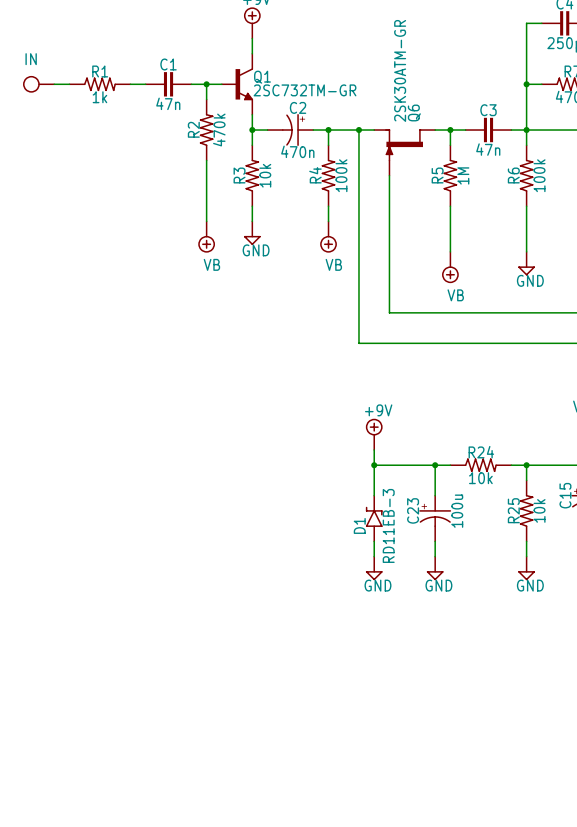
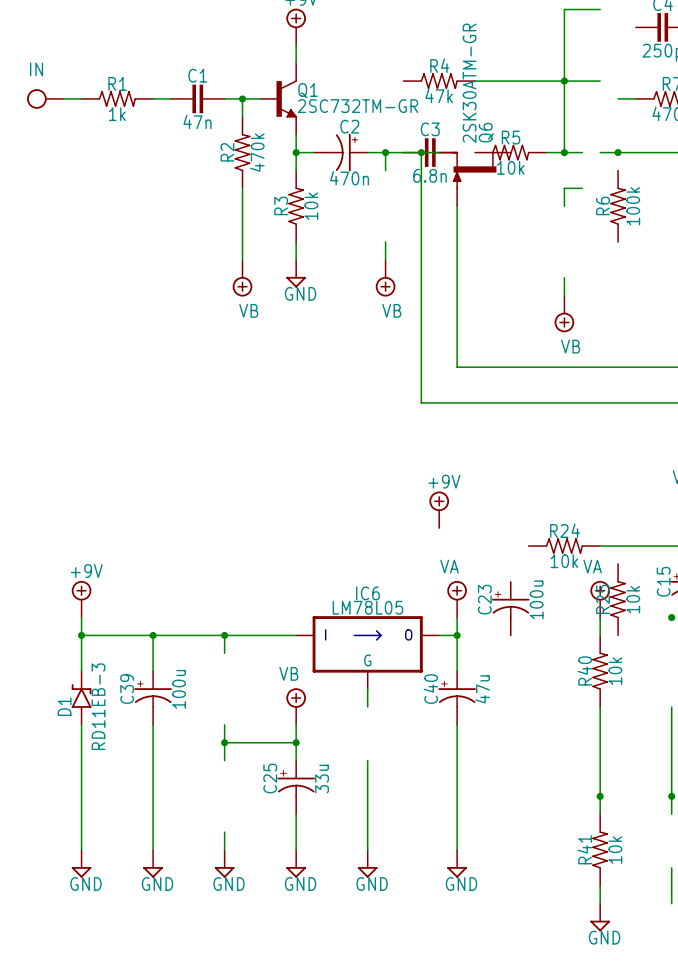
wire: none -> (600, 9) (564, 9) (564, 152)
wire: (541, 23) (526, 23) (526, 145) -> none
wire: none -> (474, 81) (600, 81)
junction: none -> (564, 81)
junction: (526, 84) -> none
wire: (450, 130) (450, 145) -> (564, 277) (564, 295)
junction position: (450, 130) -> (564, 152)
C3 position: (488, 130) -> (430, 152)
C3 value: 47n (488, 149) -> 6.8n (430, 175)
wire: none -> (582, 188) (564, 188) (564, 206)
R4 rotation: 0° (328, 175) -> 90° clockwise (439, 81)
R4 position: (328, 175) -> (439, 81)
R4 value: 100k (341, 175) -> 47k (439, 95)
R5 rotation: 0° (450, 175) -> 90° clockwise (510, 152)
R5 position: (450, 175) -> (510, 152)
R5 value: 1M (463, 175) -> 10k (510, 167)
wire: (450, 206) (450, 251) -> none
wire: (526, 206) (526, 251) -> none
power symbol: GND (526, 263) -> none
power symbol position: VB (450, 267) -> VB (564, 313)
wire: (374, 449) (374, 495) -> (457, 617) (457, 671)
wire: (374, 465) (450, 465) -> none
junction: (374, 465) -> none
wire: (435, 465) (435, 495) -> none
junction: (435, 465) -> none
wire: (526, 465) (526, 480) -> none
junction: (526, 465) -> none
power symbol: none -> +9V (81, 599)
power symbol: none -> VA (457, 599)
power symbol: none -> VA (600, 599)
D1 position: (374, 518) -> (81, 698)
wire: none -> (81, 617) (81, 671)
junction: none -> (671, 617)
wire: none -> (81, 635) (296, 635)
junction: none -> (81, 635)
wire: none -> (153, 635) (153, 671)
junction: none -> (153, 635)
wire: none -> (224, 635) (224, 653)
junction: none -> (224, 635)
wire: (374, 541) (374, 556) -> (439, 635) (457, 635)
junction: none -> (457, 635)
wire: (435, 541) (435, 556) -> (367, 689) (367, 706)
wire: (526, 541) (526, 556) -> (600, 617) (600, 635)
IC6: none -> LM78L05 (367, 652)
power symbol: GND (374, 568) -> none
power symbol: GND (435, 568) -> none
power symbol: GND (526, 568) -> none
R40: none -> 10k (600, 671)
C39: none -> 100u (153, 698)
C40: none -> 47u (457, 698)
power symbol: none -> VB (296, 706)
wire: none -> (600, 706) (600, 814)
wire: none -> (671, 706) (671, 814)
wire: none -> (81, 724) (81, 850)
wire: none -> (153, 724) (153, 850)
wire: none -> (224, 724) (224, 760)
wire: none -> (296, 724) (296, 760)
wire: none -> (457, 724) (457, 850)
wire: none -> (224, 742) (296, 742)
junction: none -> (224, 742)
junction: none -> (296, 742)
wire: none -> (367, 760) (367, 850)
C25: none -> 33u (296, 787)
junction: none -> (600, 796)
junction: none -> (671, 796)
wire: none -> (296, 814) (296, 850)
wire: none -> (224, 832) (224, 850)
R41: none -> 10k (600, 850)
power symbol: none -> GND (81, 863)
power symbol: none -> GND (153, 863)
power symbol: none -> GND (224, 863)
power symbol: none -> GND (296, 863)
power symbol: none -> GND (367, 863)
power symbol: none -> GND (457, 863)
wire: none -> (671, 867) (671, 903)
wire: none -> (600, 885) (600, 903)
power symbol: none -> GND (600, 917)

